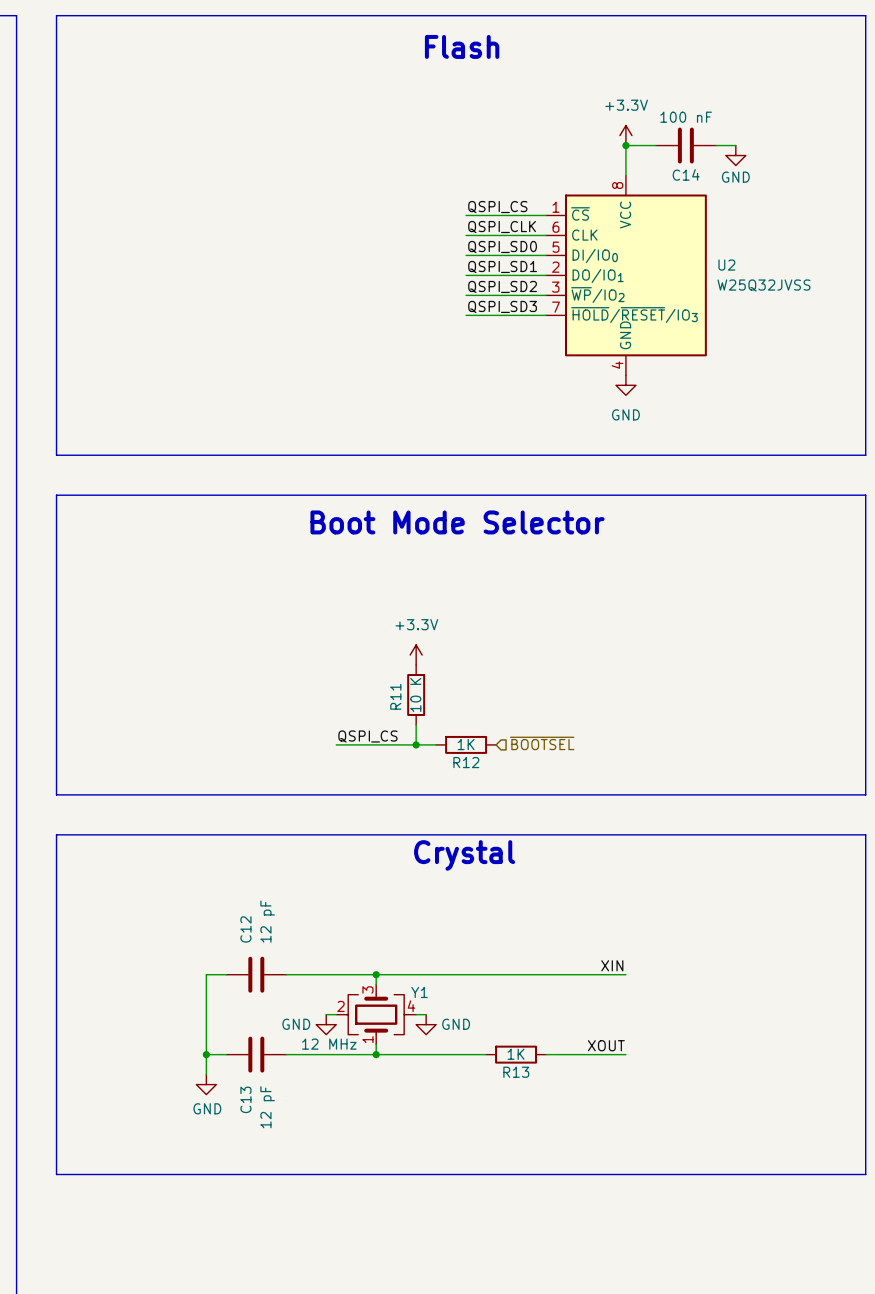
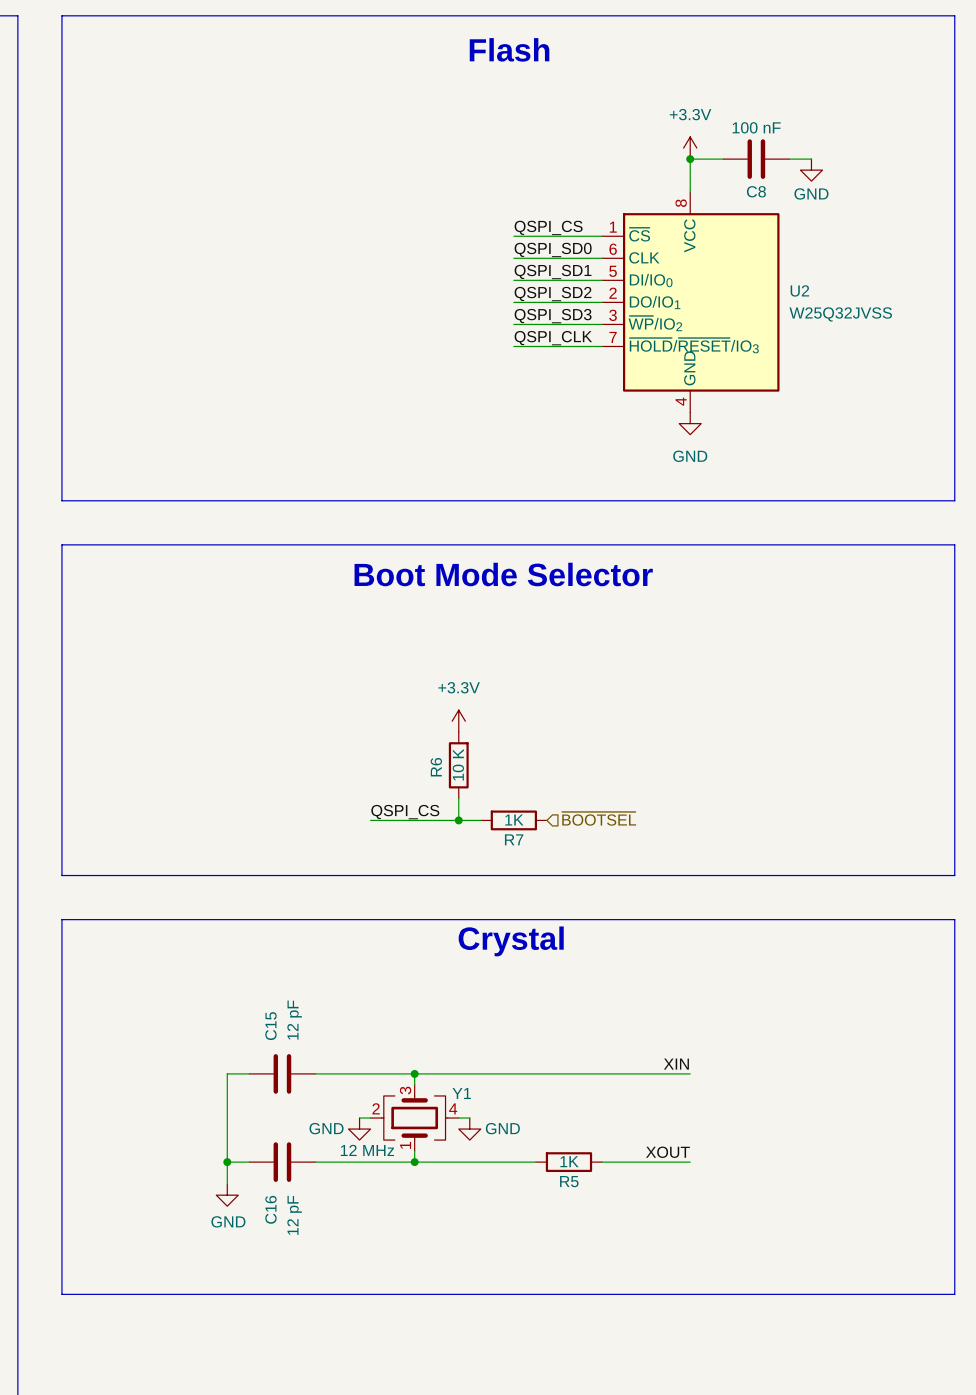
C14 name: C14 (686, 174) -> C8 (756, 191)
label: QSPI_CLK (502, 227) -> QSPI_SD0 (553, 249)
label: QSPI_SD0 (502, 246) -> QSPI_SD1 (553, 272)
label: QSPI_SD1 (502, 266) -> QSPI_SD2 (553, 294)
label: QSPI_SD2 (502, 286) -> QSPI_SD3 (553, 316)
label: QSPI_SD3 (502, 306) -> QSPI_CLK (553, 338)
R11 name: R11 (395, 696) -> R6 (436, 767)
R12 name: R12 (466, 762) -> R7 (514, 839)
C12 name: C12 (245, 929) -> C15 (270, 1026)
R13 name: R13 (516, 1072) -> R5 (569, 1181)
C13 name: C13 (245, 1099) -> C16 (270, 1209)

